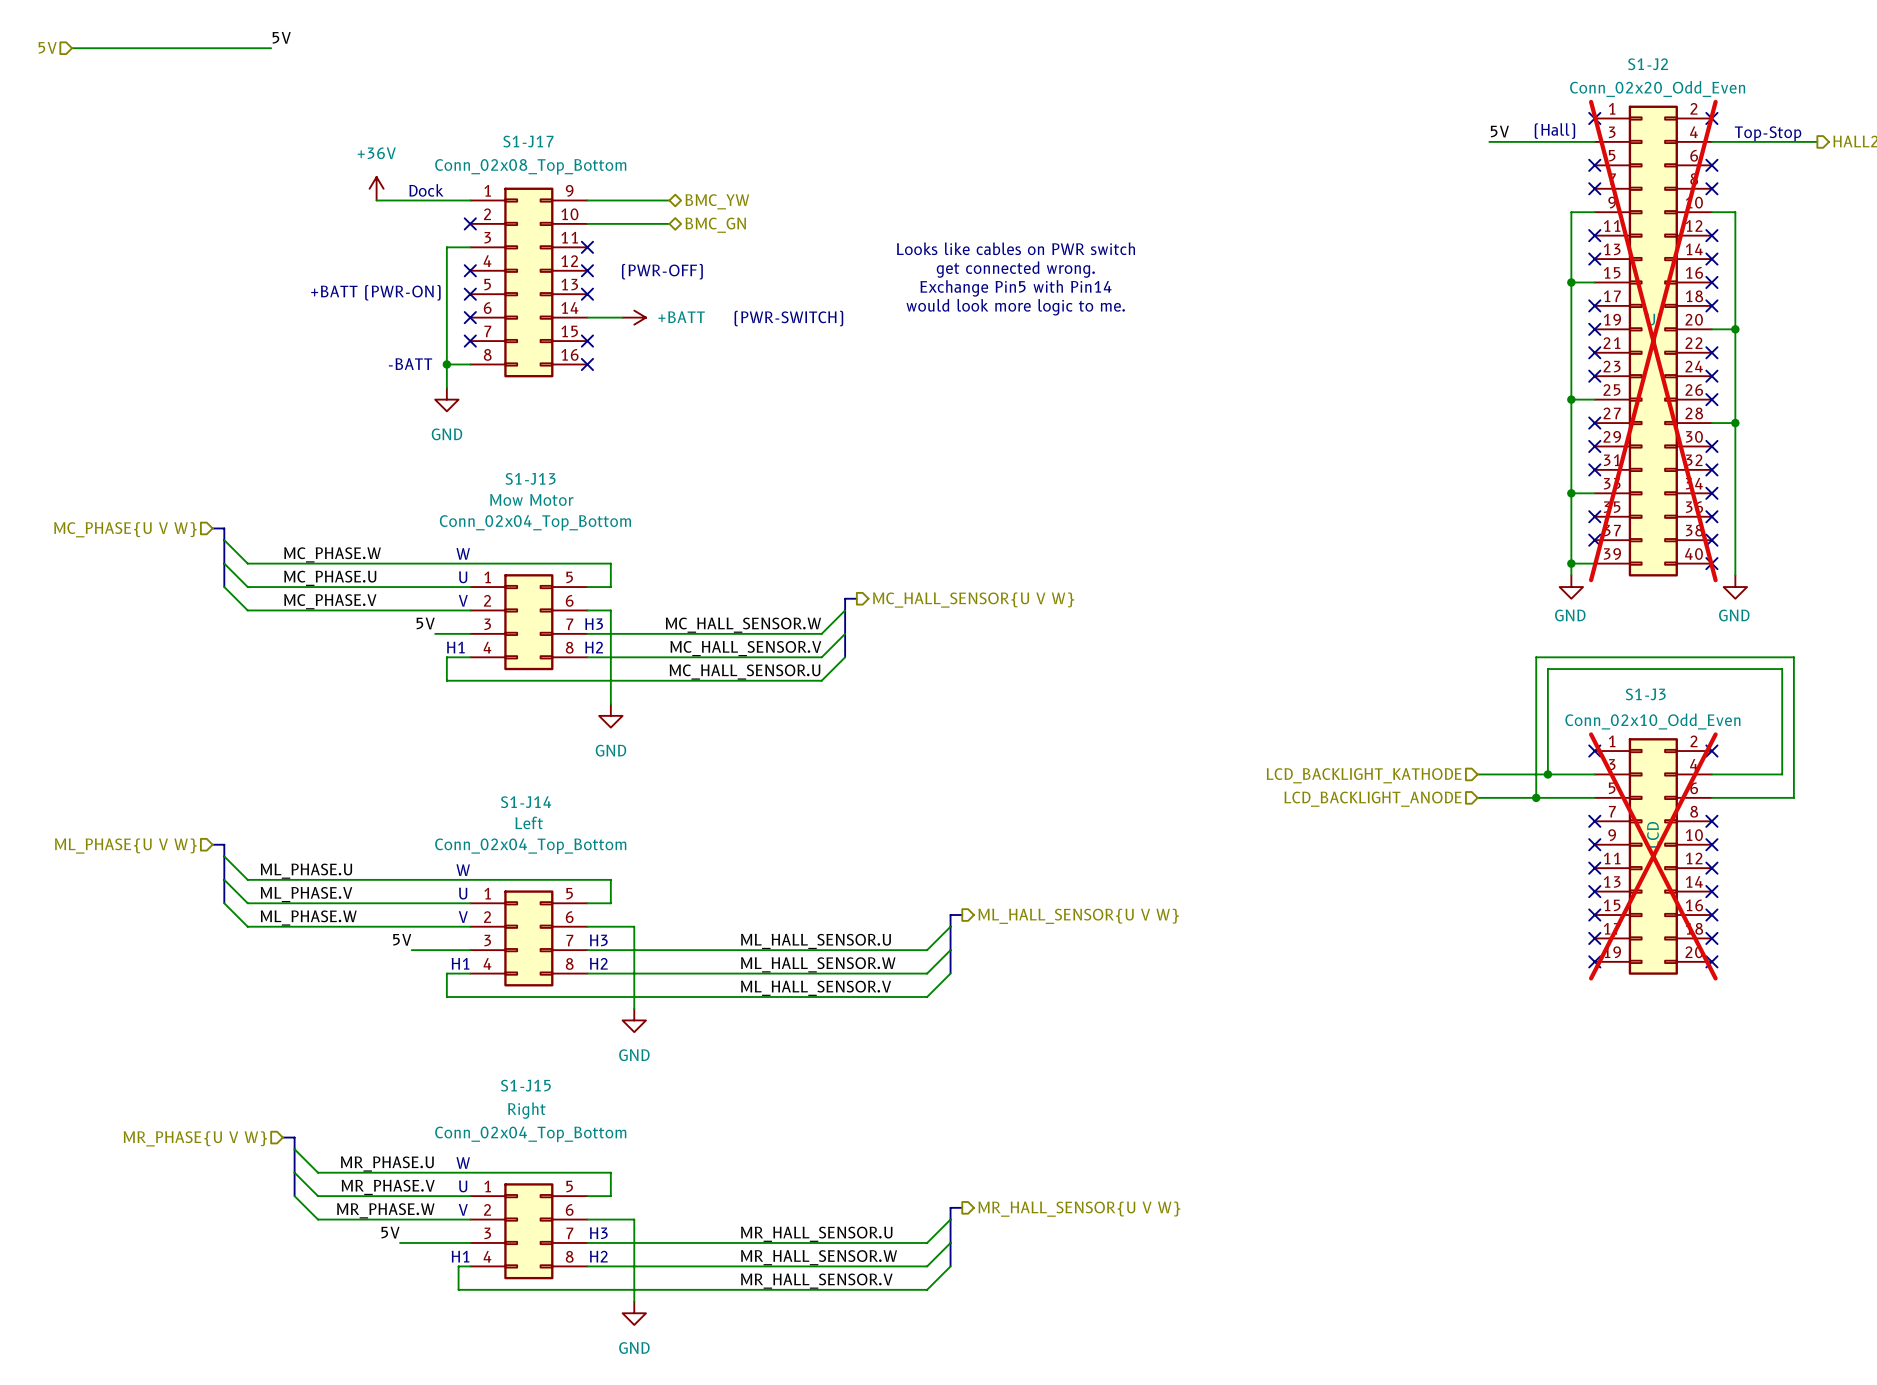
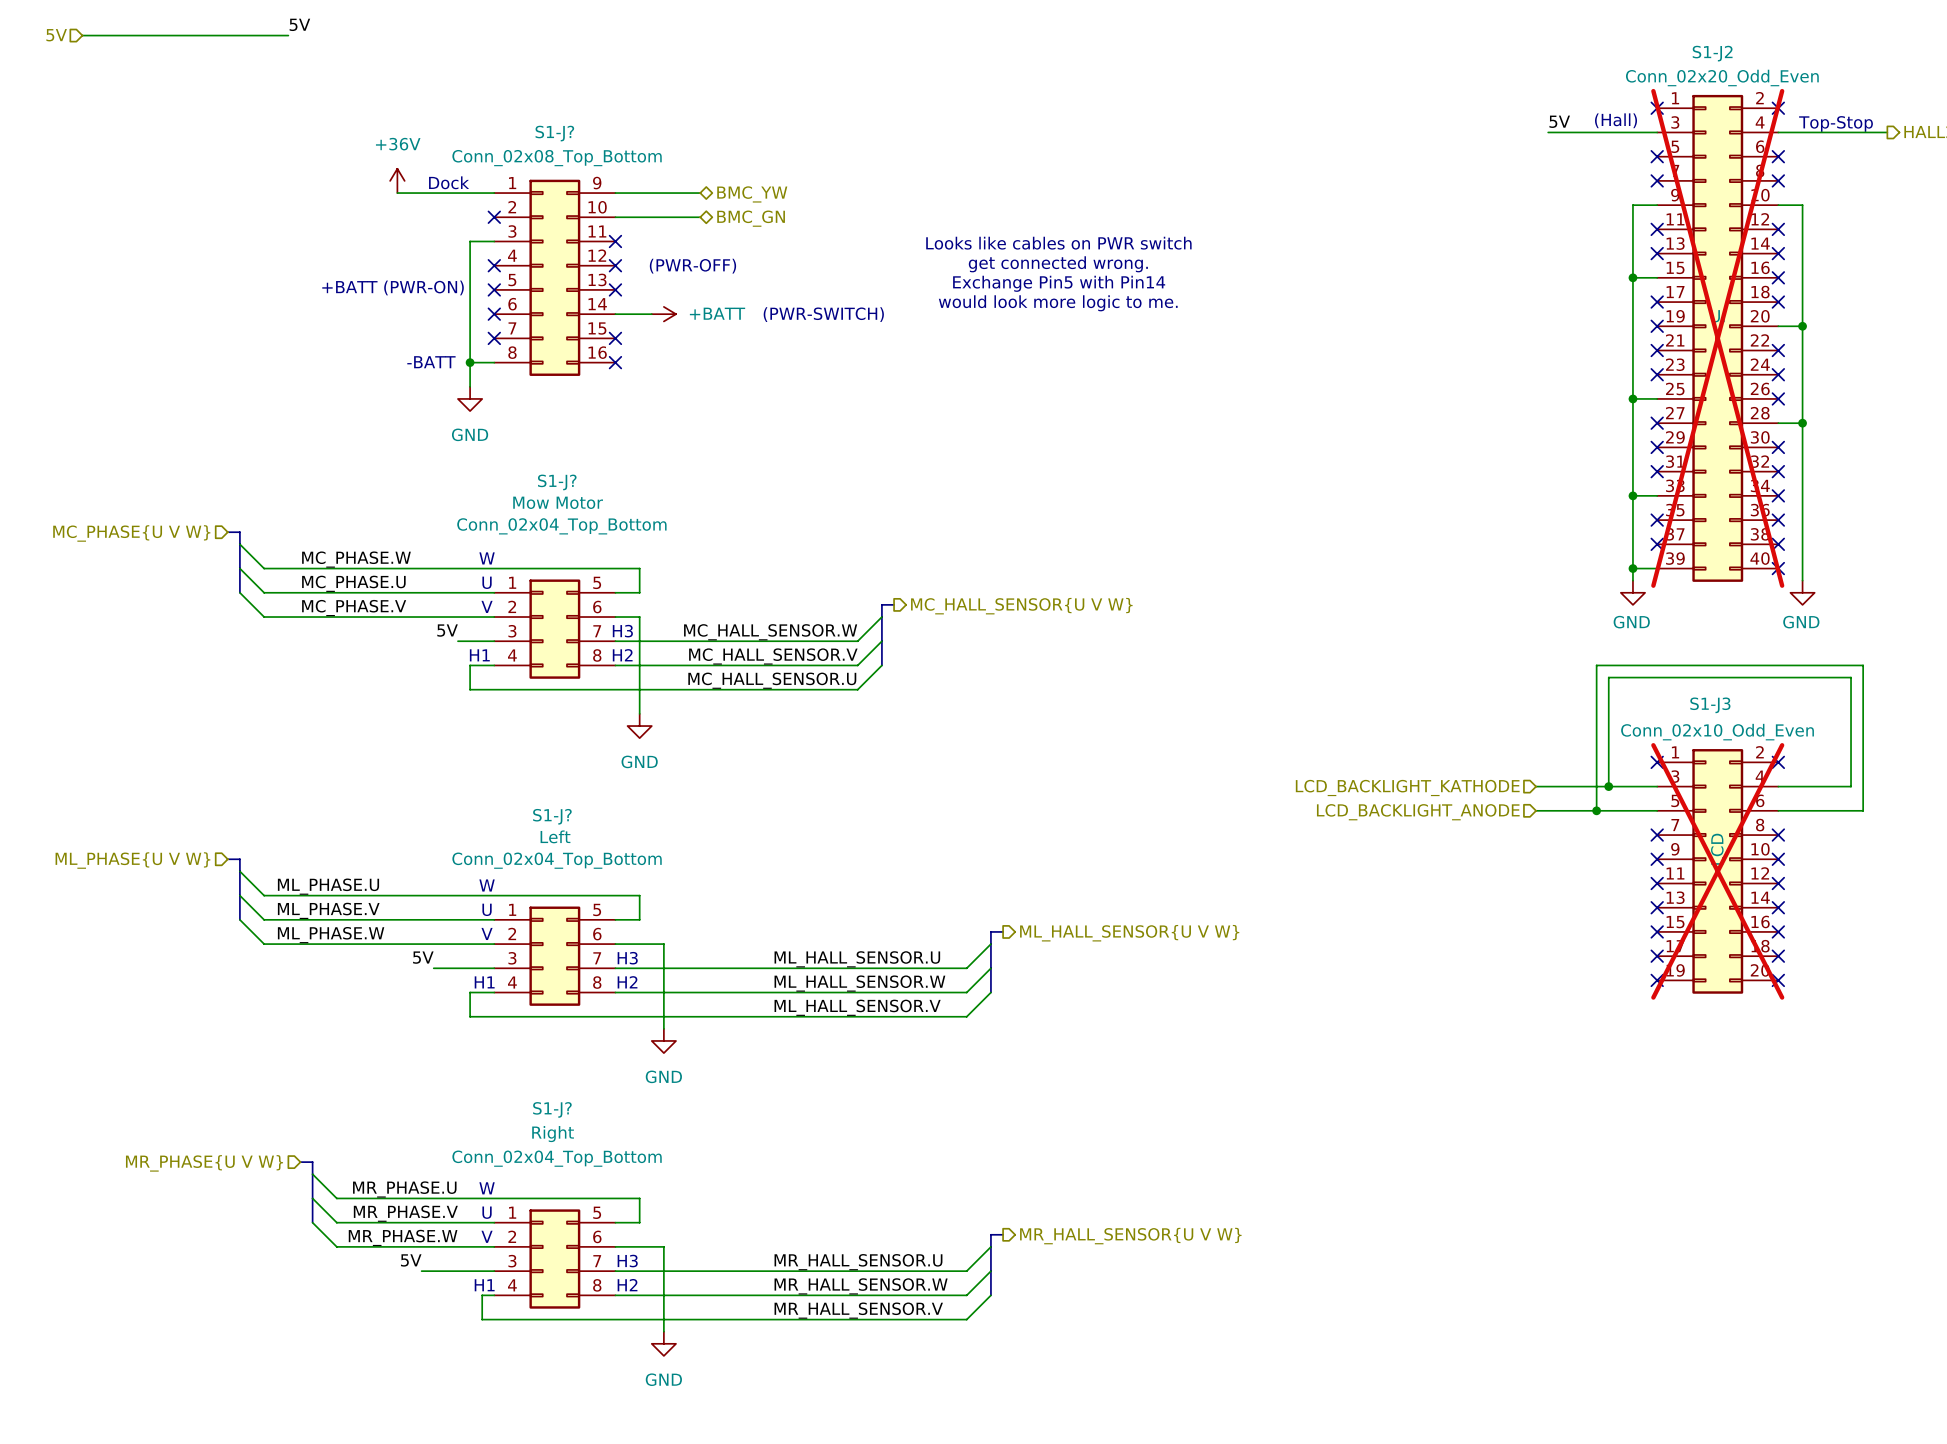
S1-J17 name: S1-J17 (528, 141) -> S1-J? (554, 133)
S1-J13 name: S1-J13 (530, 478) -> S1-J? (557, 482)
S1-J14 name: S1-J14 (526, 802) -> S1-J? (552, 816)
S1-J15 name: S1-J15 (525, 1085) -> S1-J? (552, 1109)

